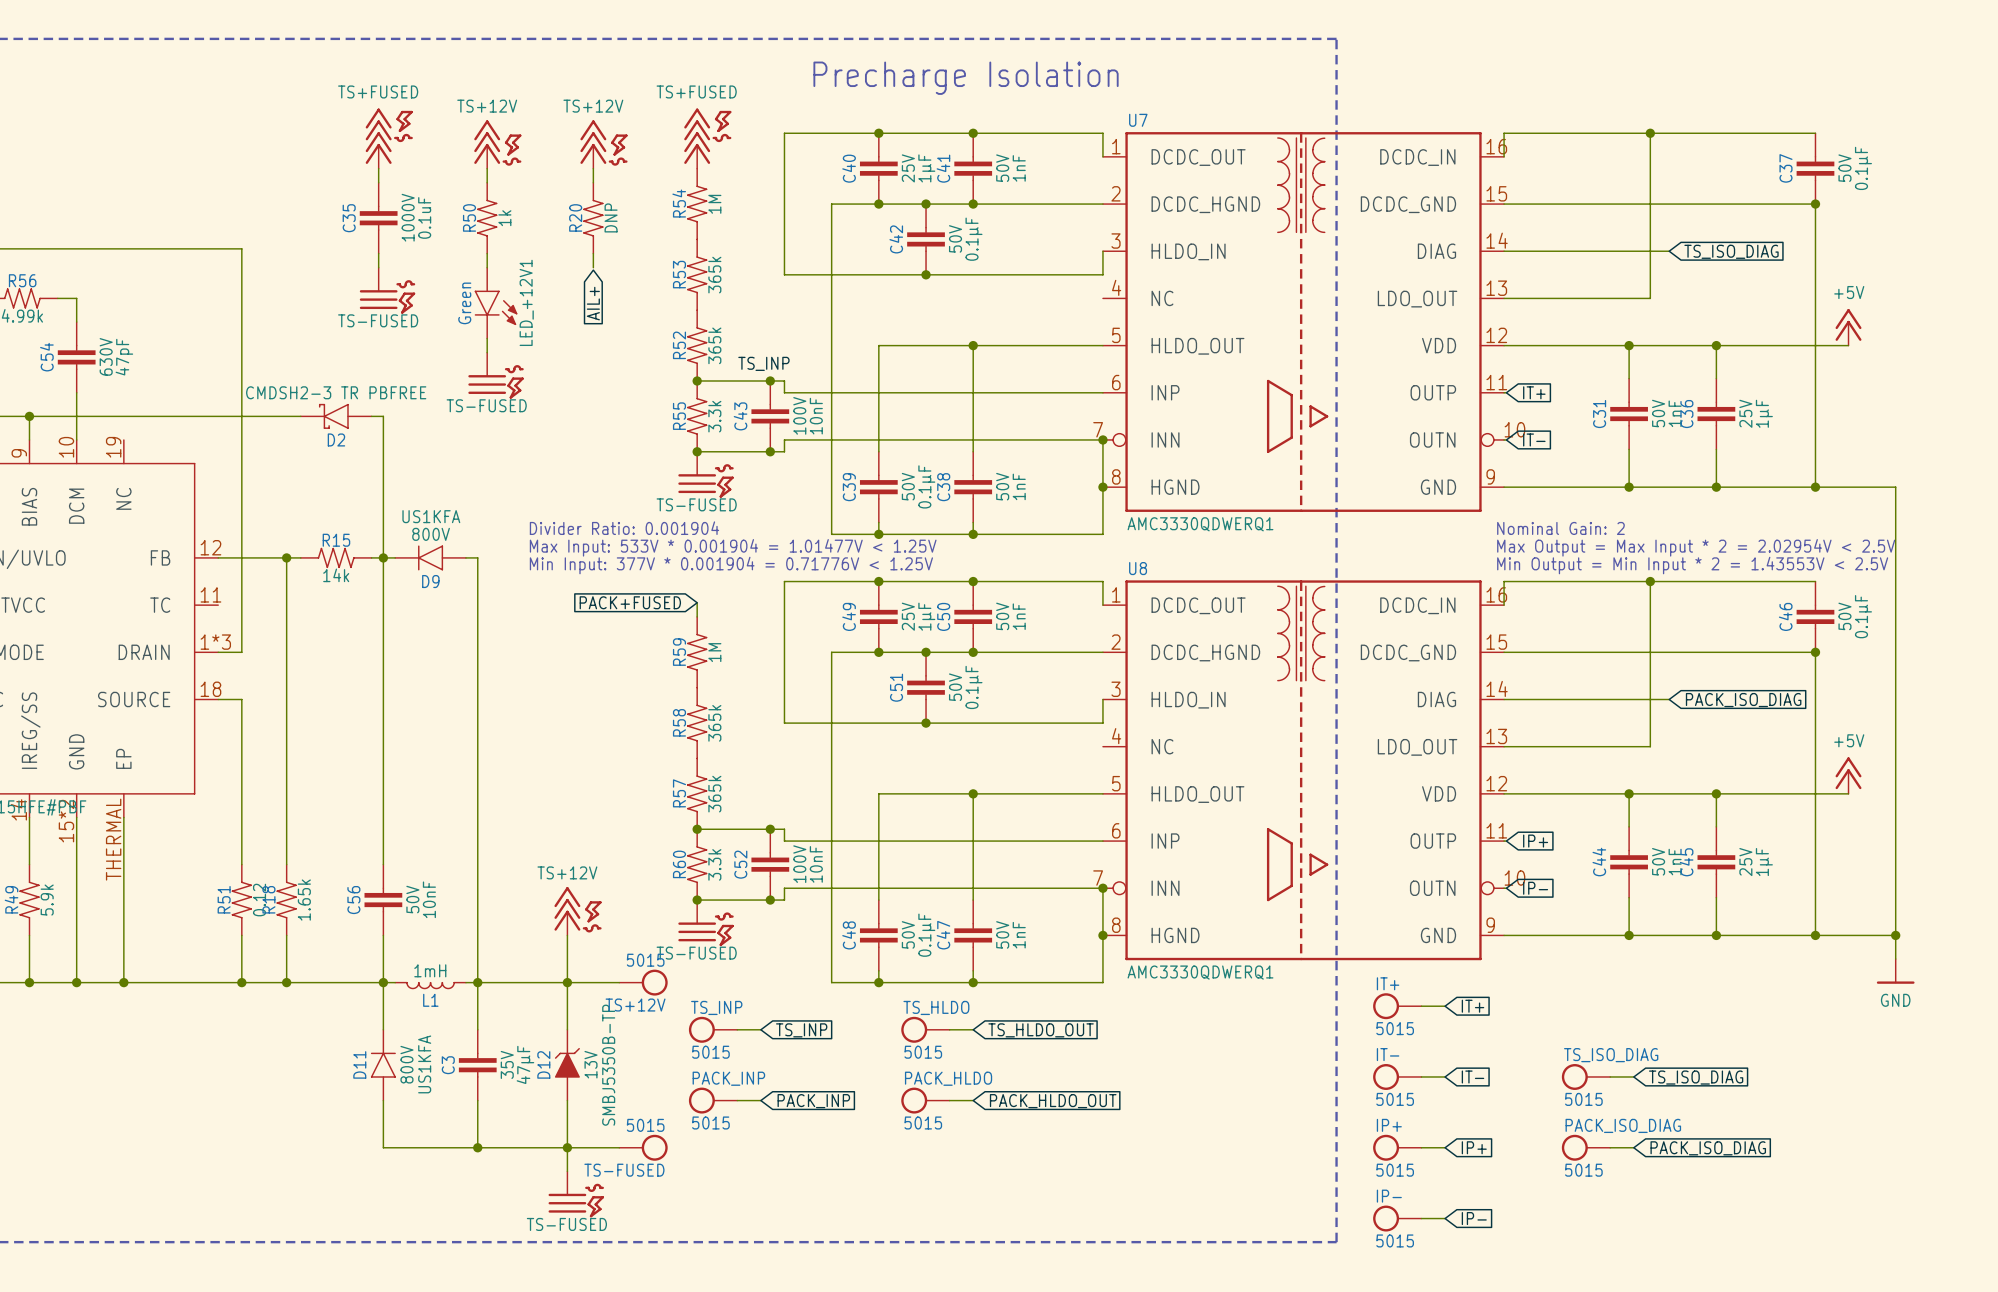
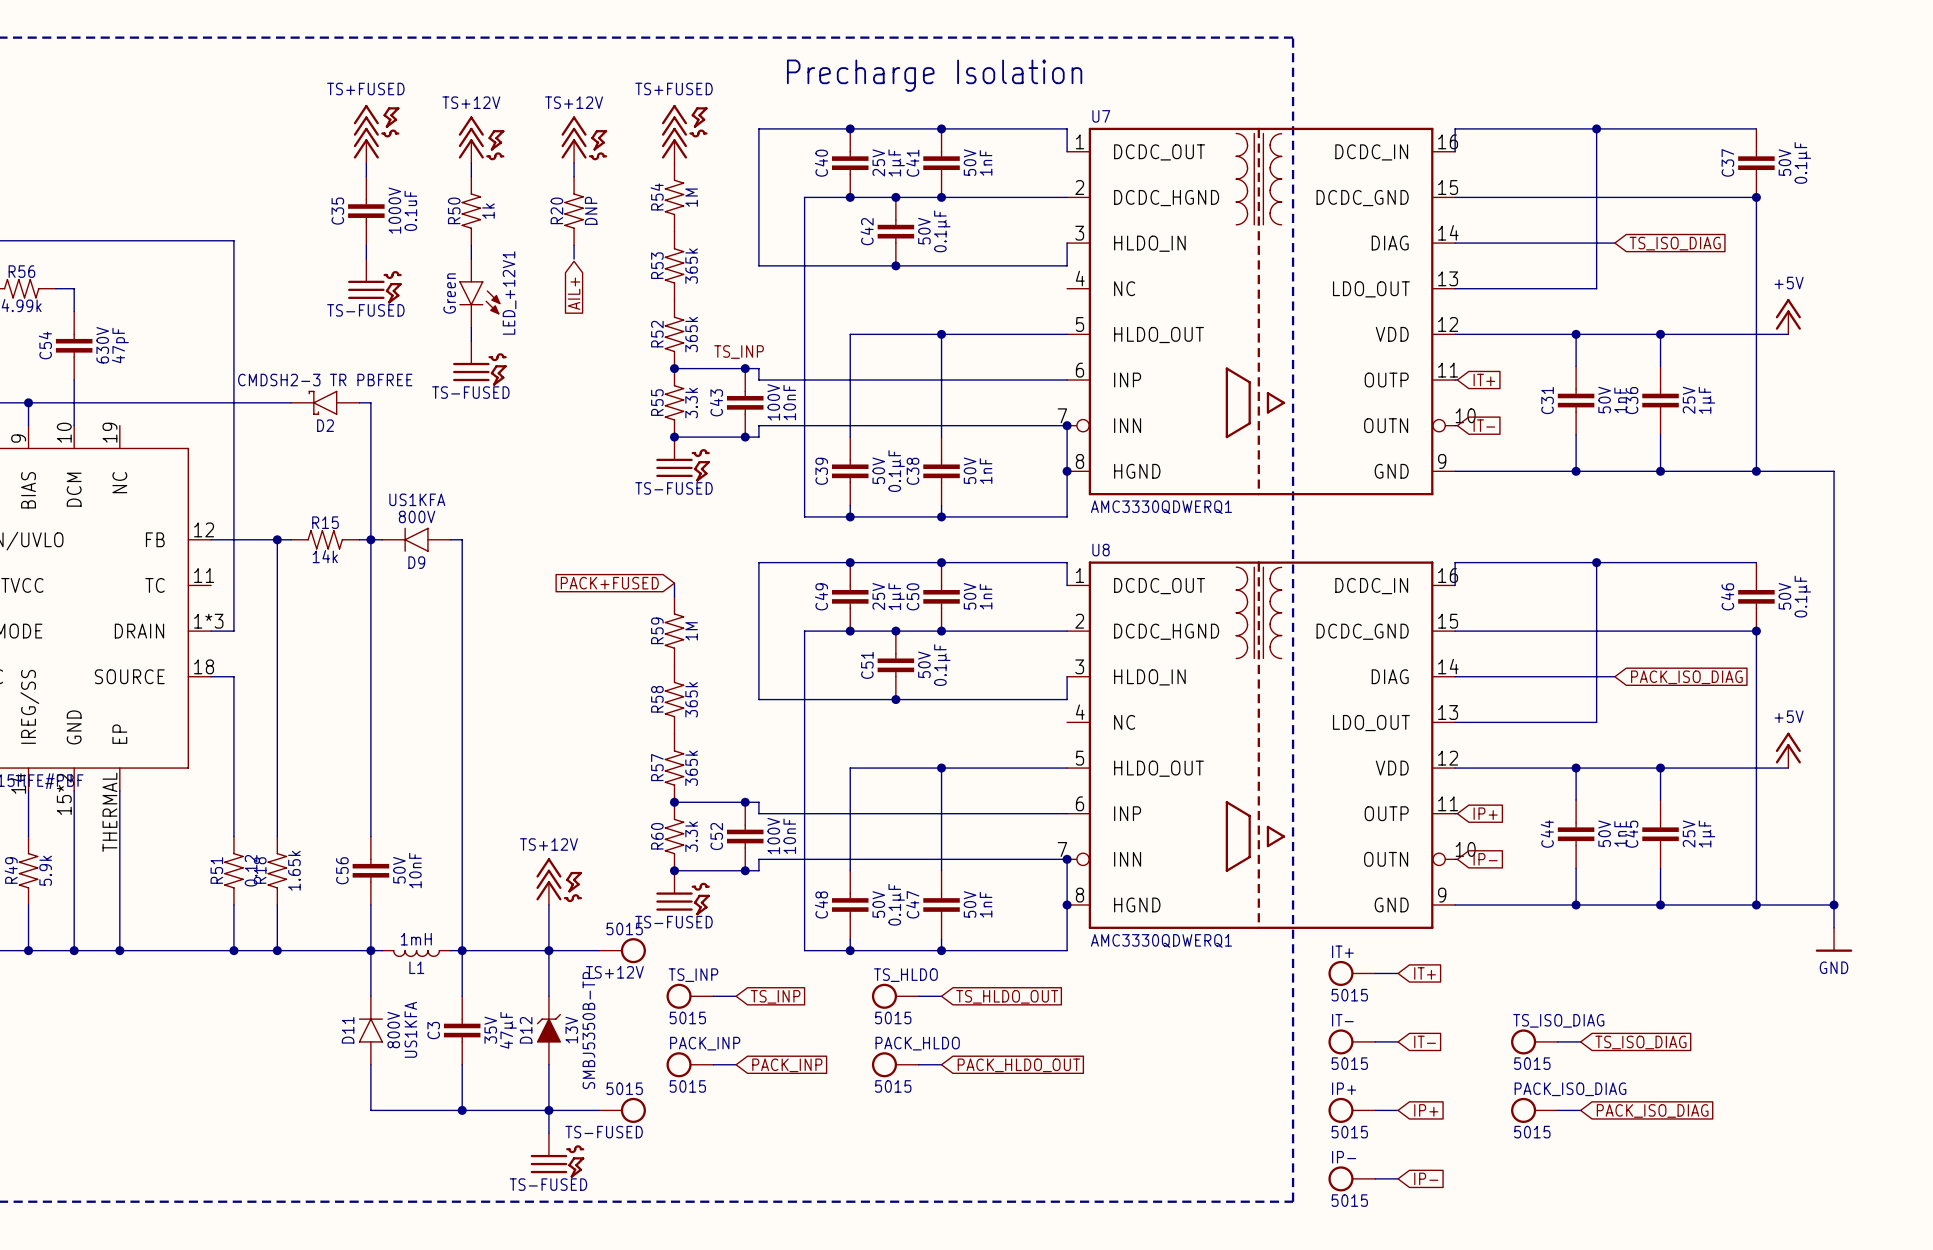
text: Divider Ratio: 0.001904 (624, 528) -> none
text: Nominal Gain: 2 (1560, 528) -> none
text: Max Input: 533V * 0.001904 = 1.01477V < 1.25V (733, 547) -> none
text: Max Output = Max Input * 2 = 2.02954V < 2.5V (1696, 547) -> none
text: Min Input: 377V * 0.001904 = 0.71776V < 1.25V (731, 565) -> none
text: Min Output = Min Input * 2 = 1.43553V < 2.5V (1692, 565) -> none

